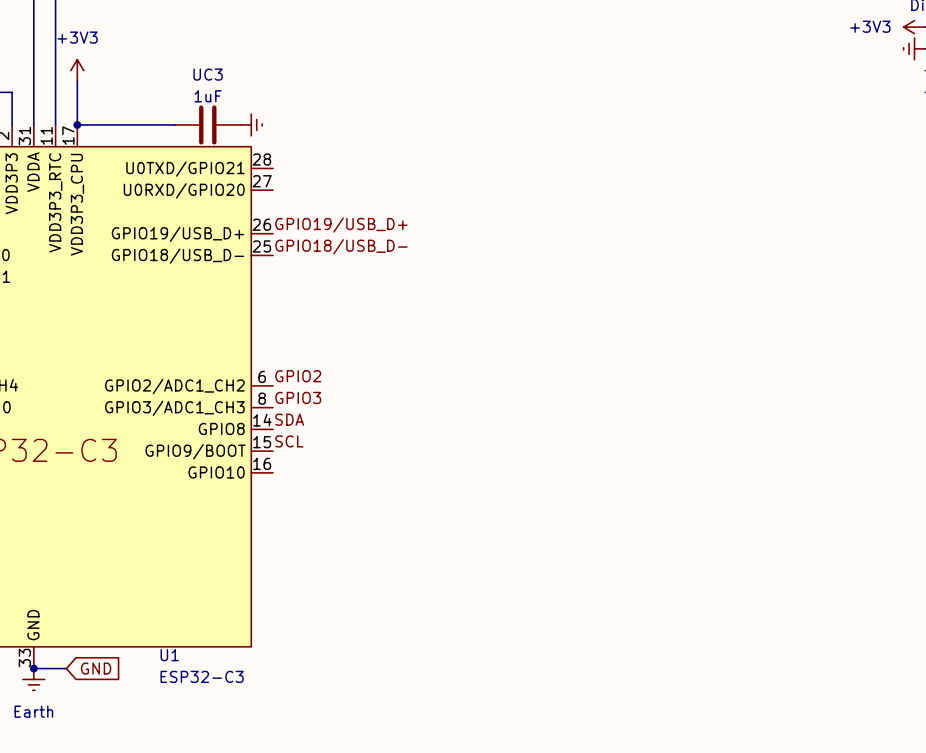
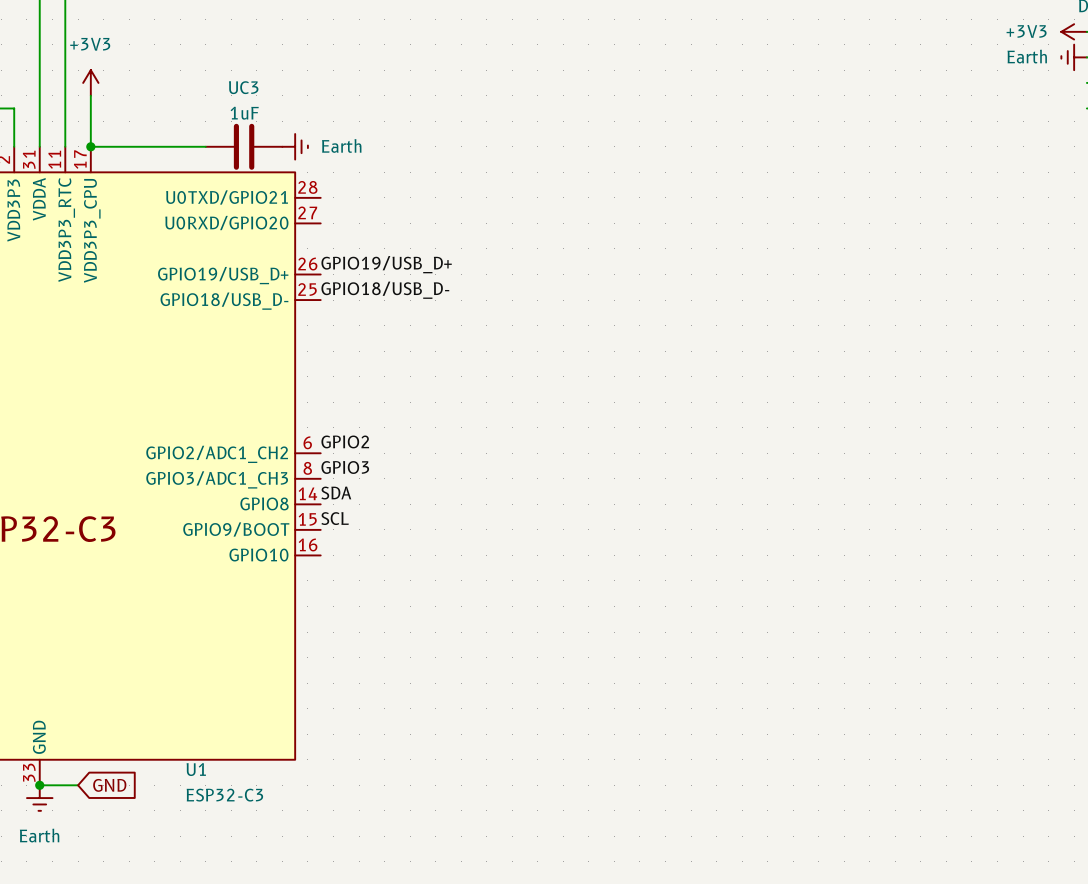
power symbol text: none -> Earth (1027, 56)
power symbol text: none -> Earth (341, 145)

